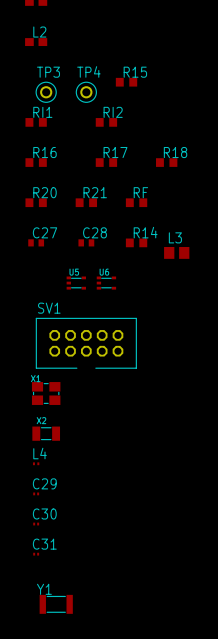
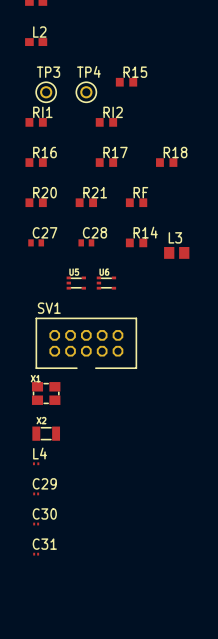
Y1: (56, 604) -> none

